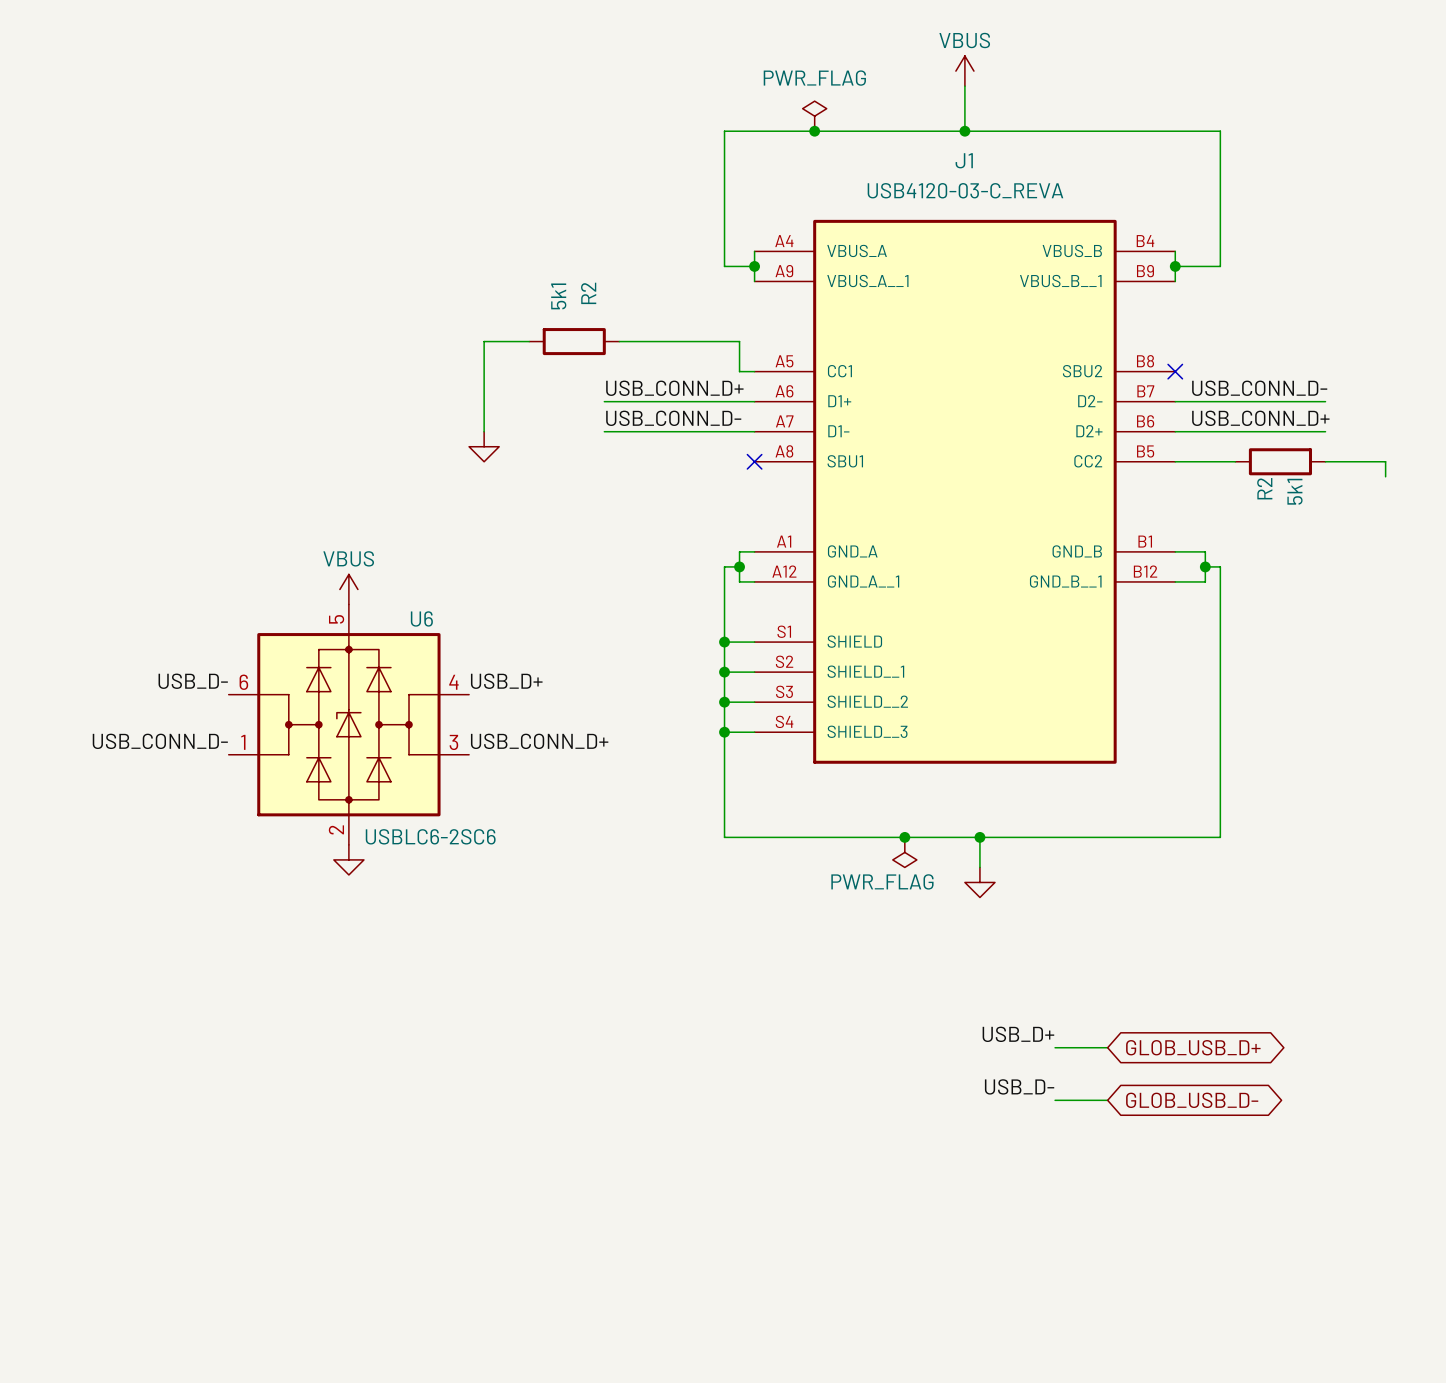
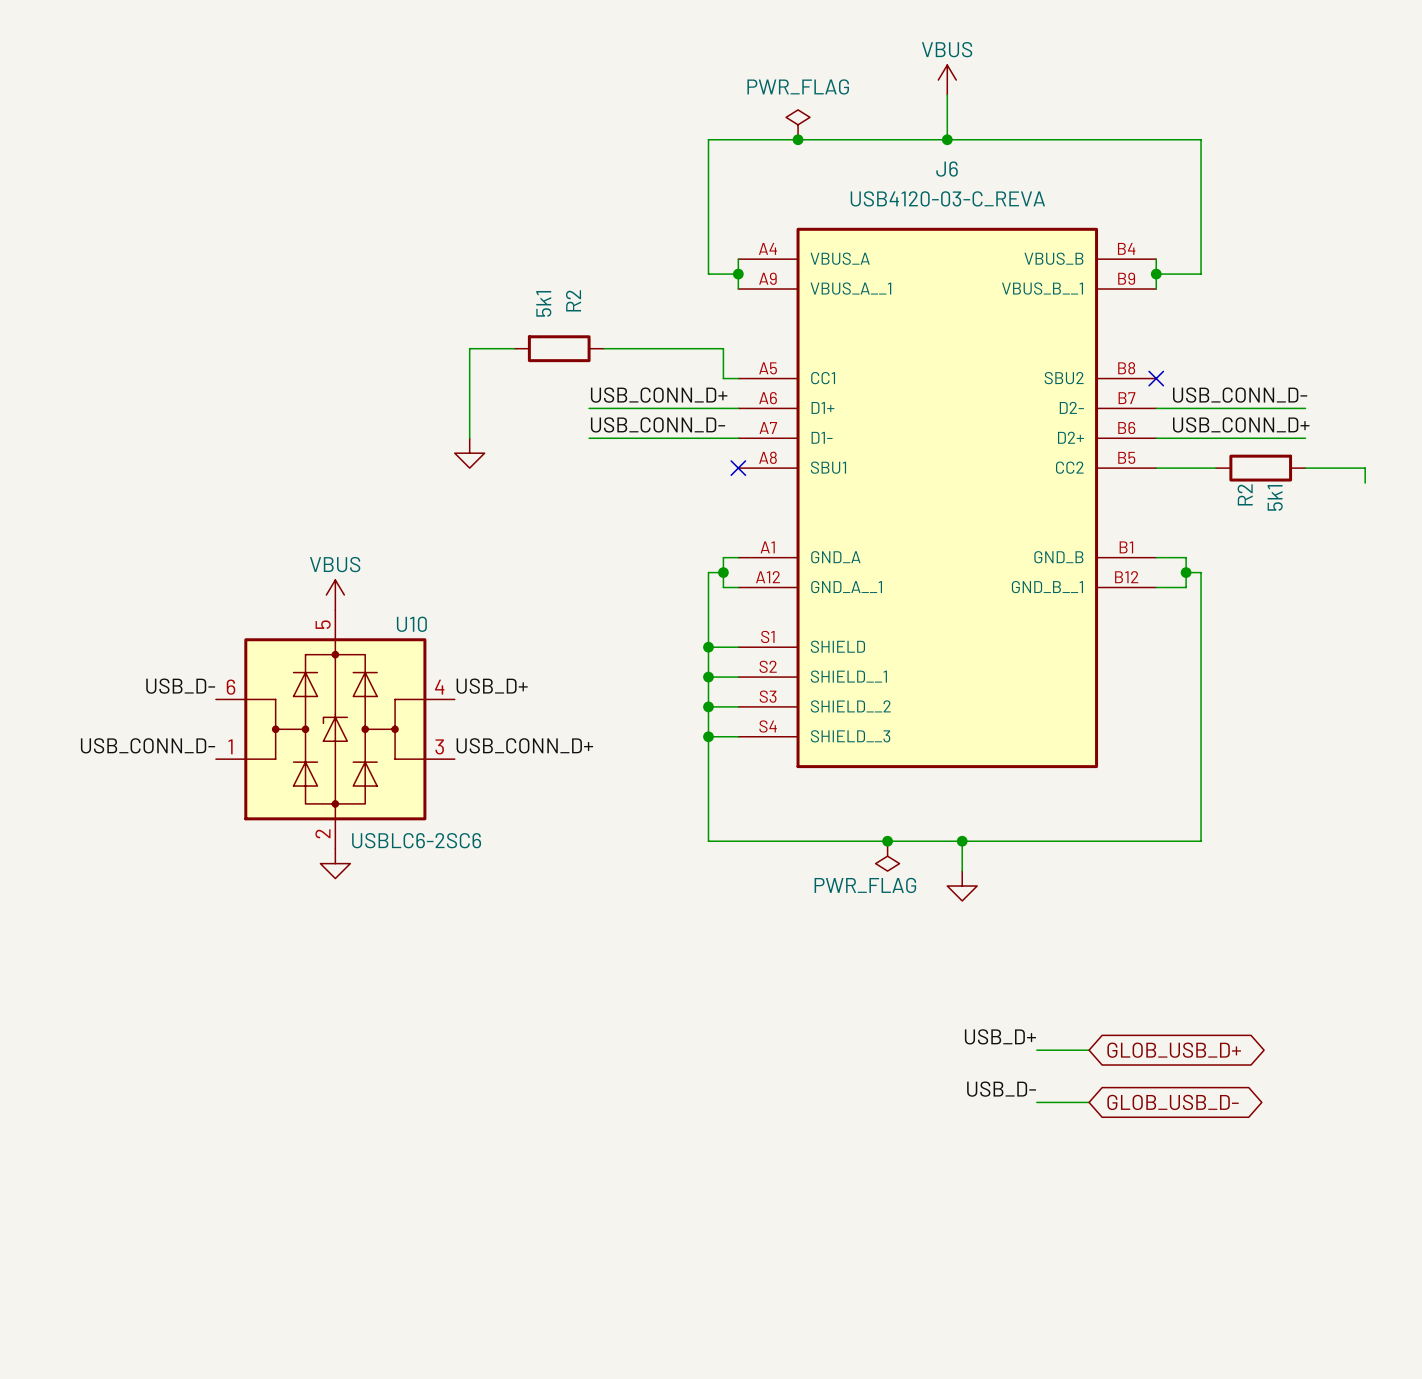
J1 name: J1 (964, 160) -> J6 (947, 169)
U6 name: U6 (421, 618) -> U10 (411, 624)

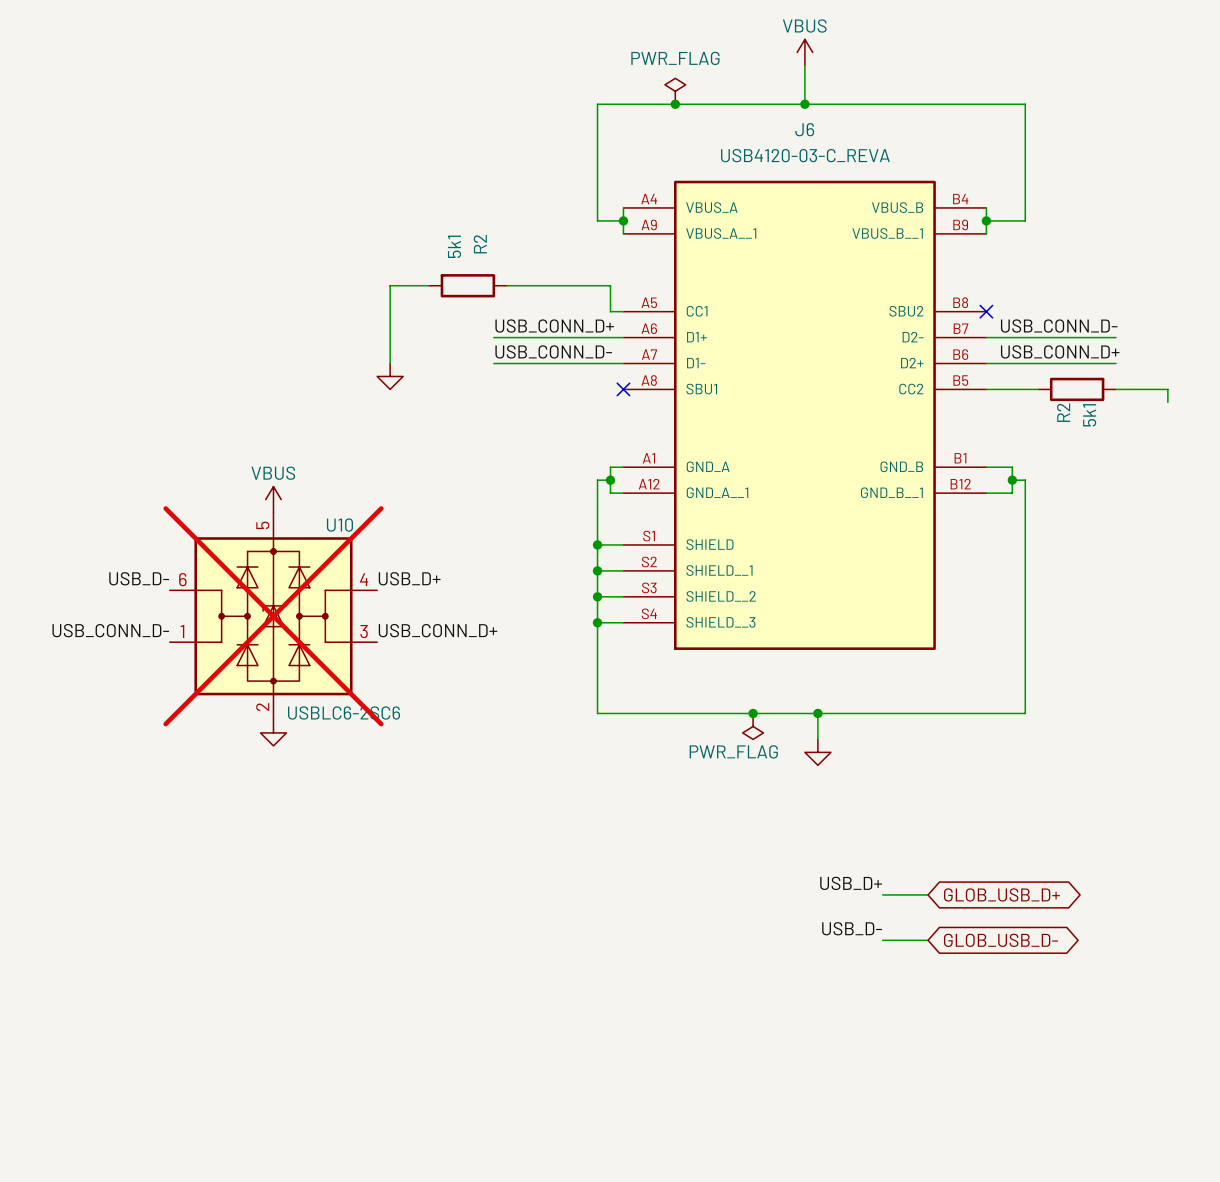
U10 do-not-place cross: none -> (273, 616)

